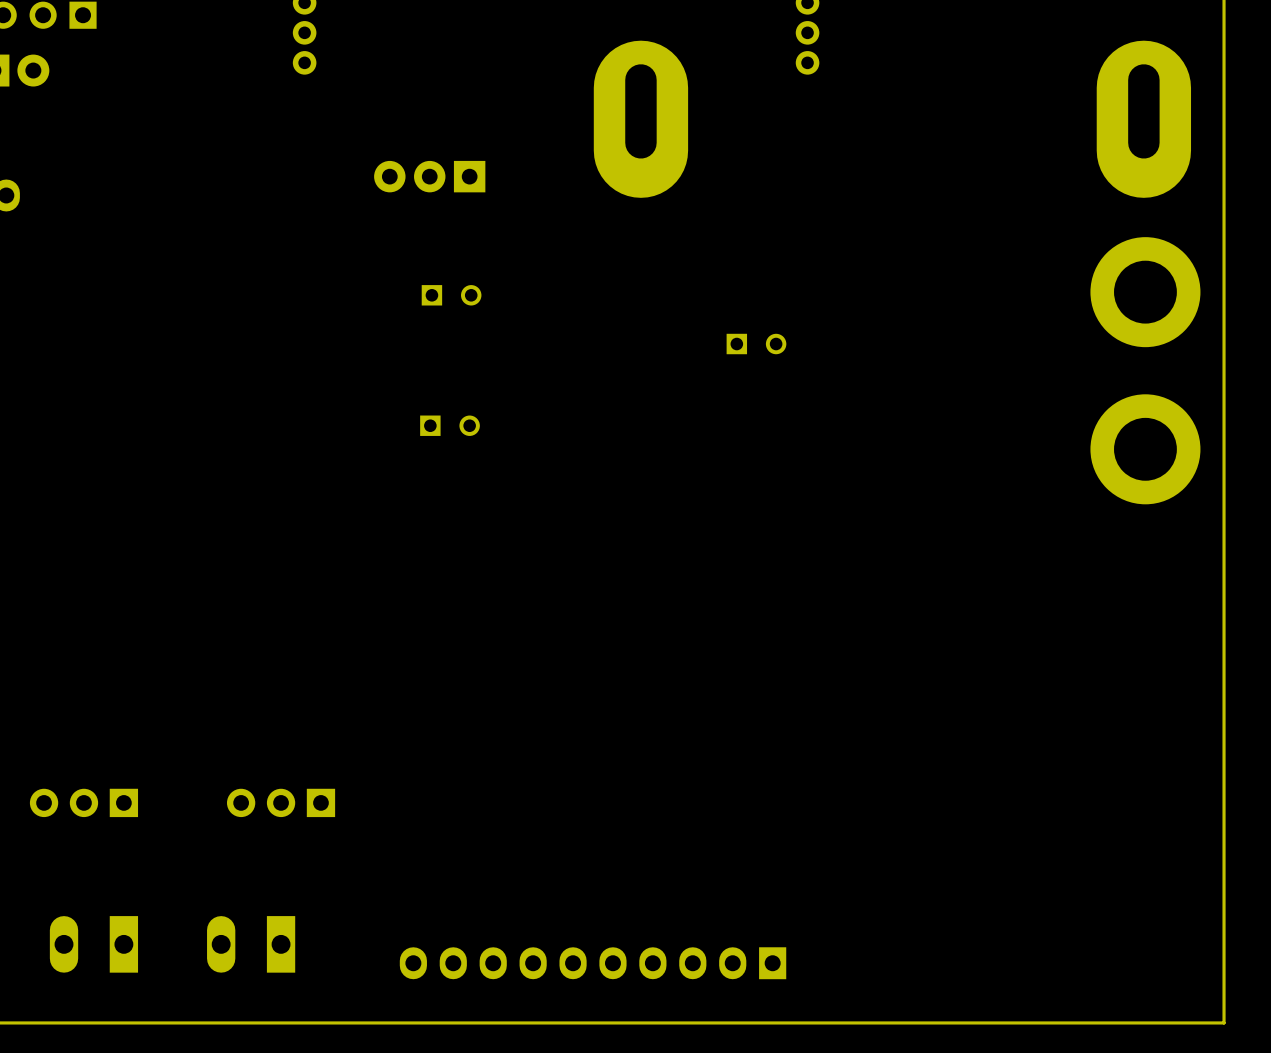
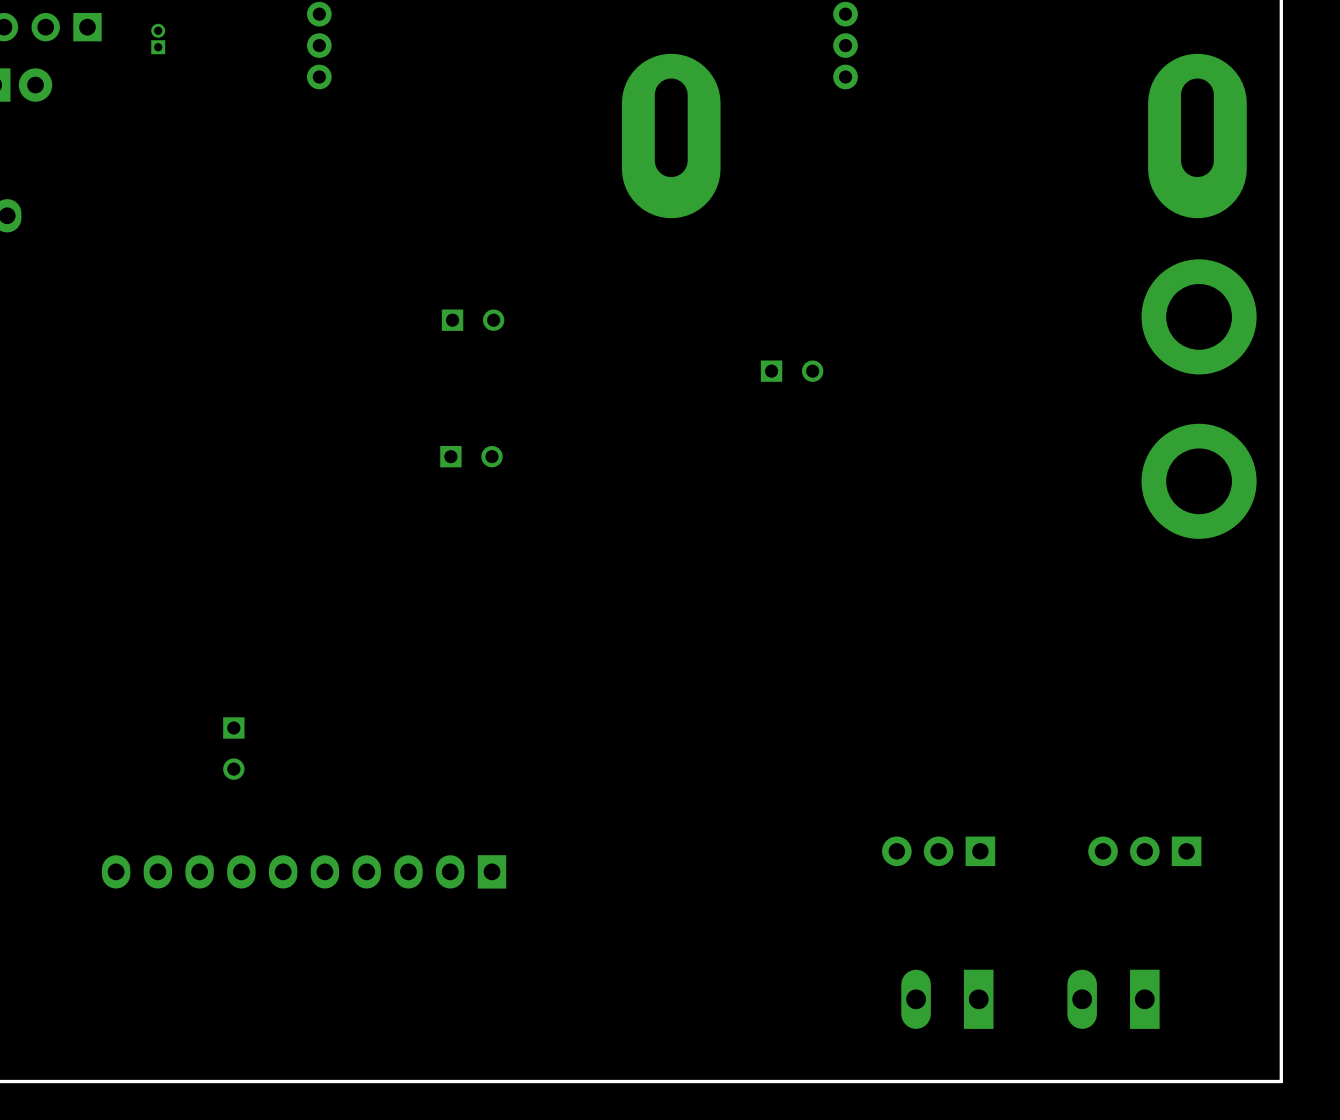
part: none -> (158, 38)
part: (429, 176) -> none
part: none -> (233, 748)
part: (83, 802) -> none
part: (281, 802) -> none
part: none -> (938, 851)
part: none -> (1144, 851)
part: (93, 944) -> none
part: (251, 944) -> none
part: none -> (947, 999)
part: none -> (1113, 999)
part position: (593, 963) -> (304, 871)

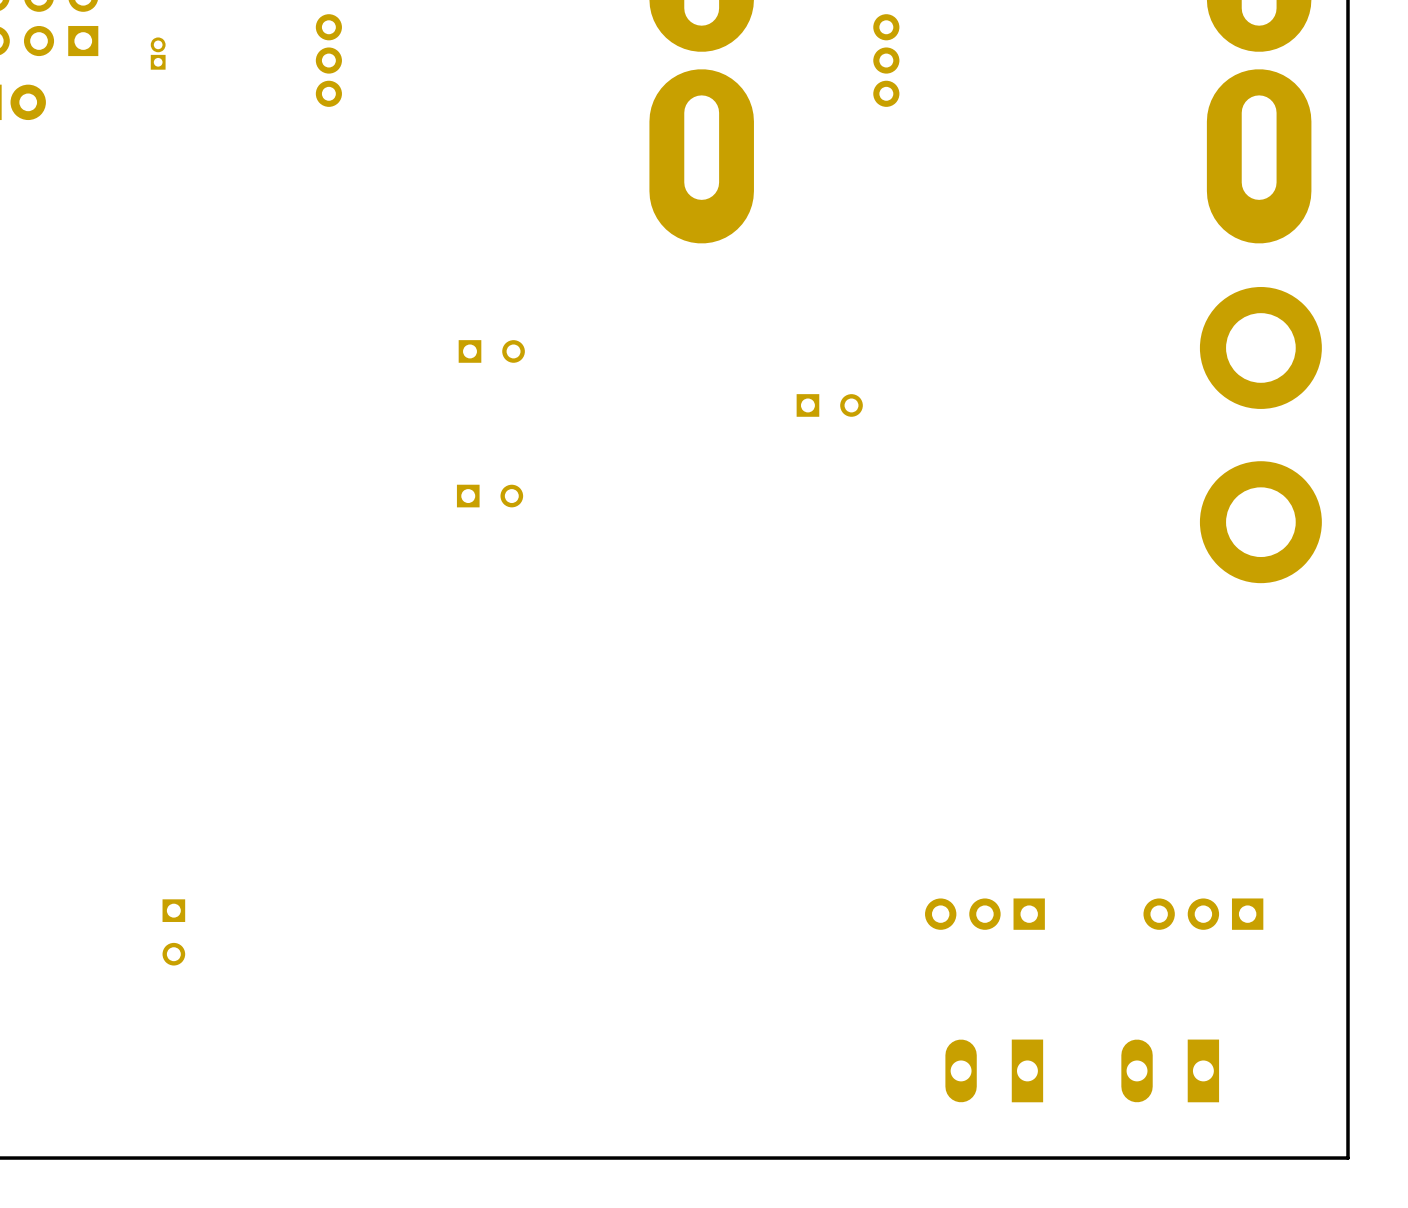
part position: (233, 748) -> (173, 932)
part: (304, 871) -> none

